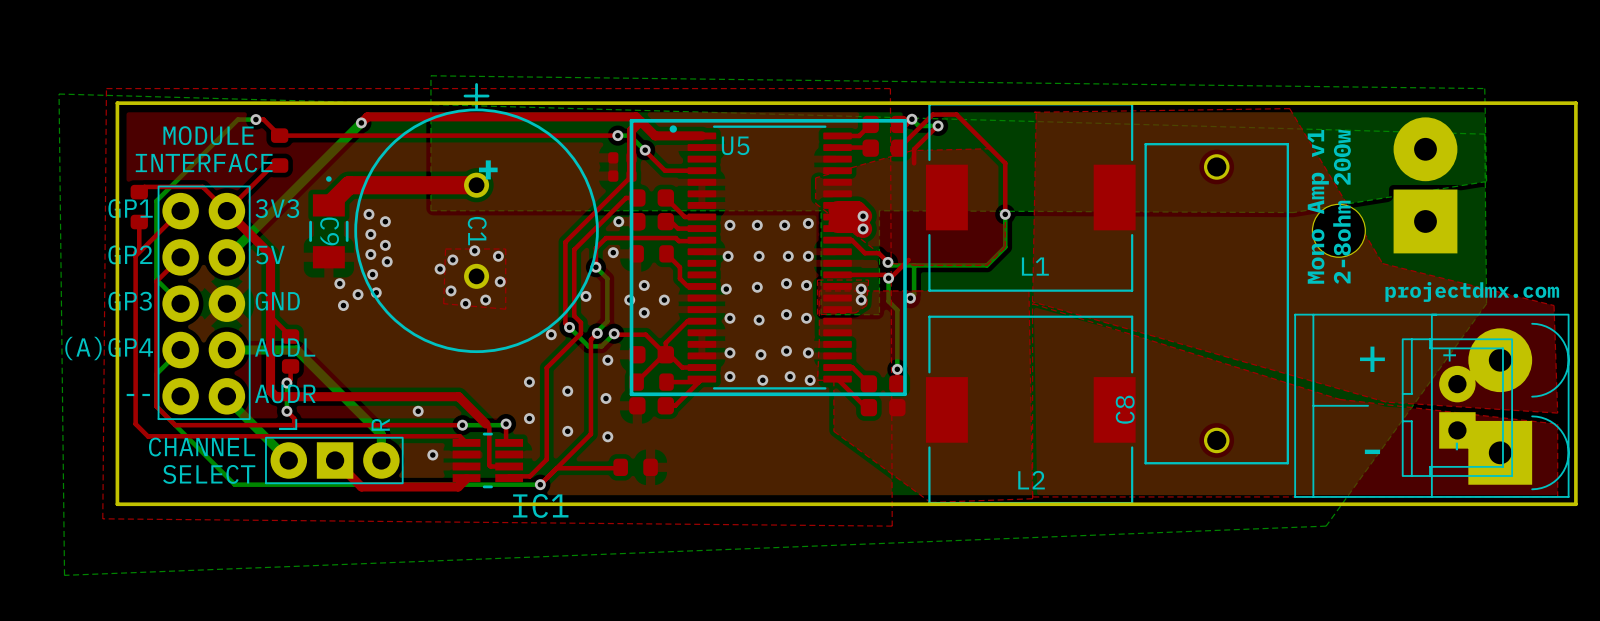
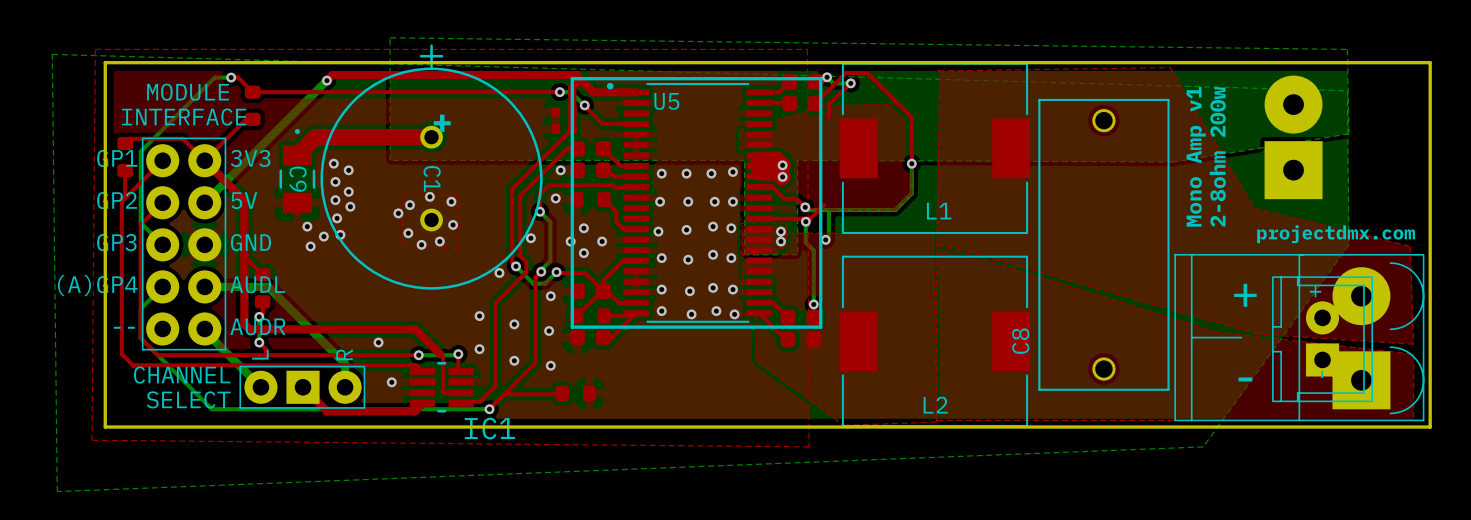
part: (1338, 230) -> none

